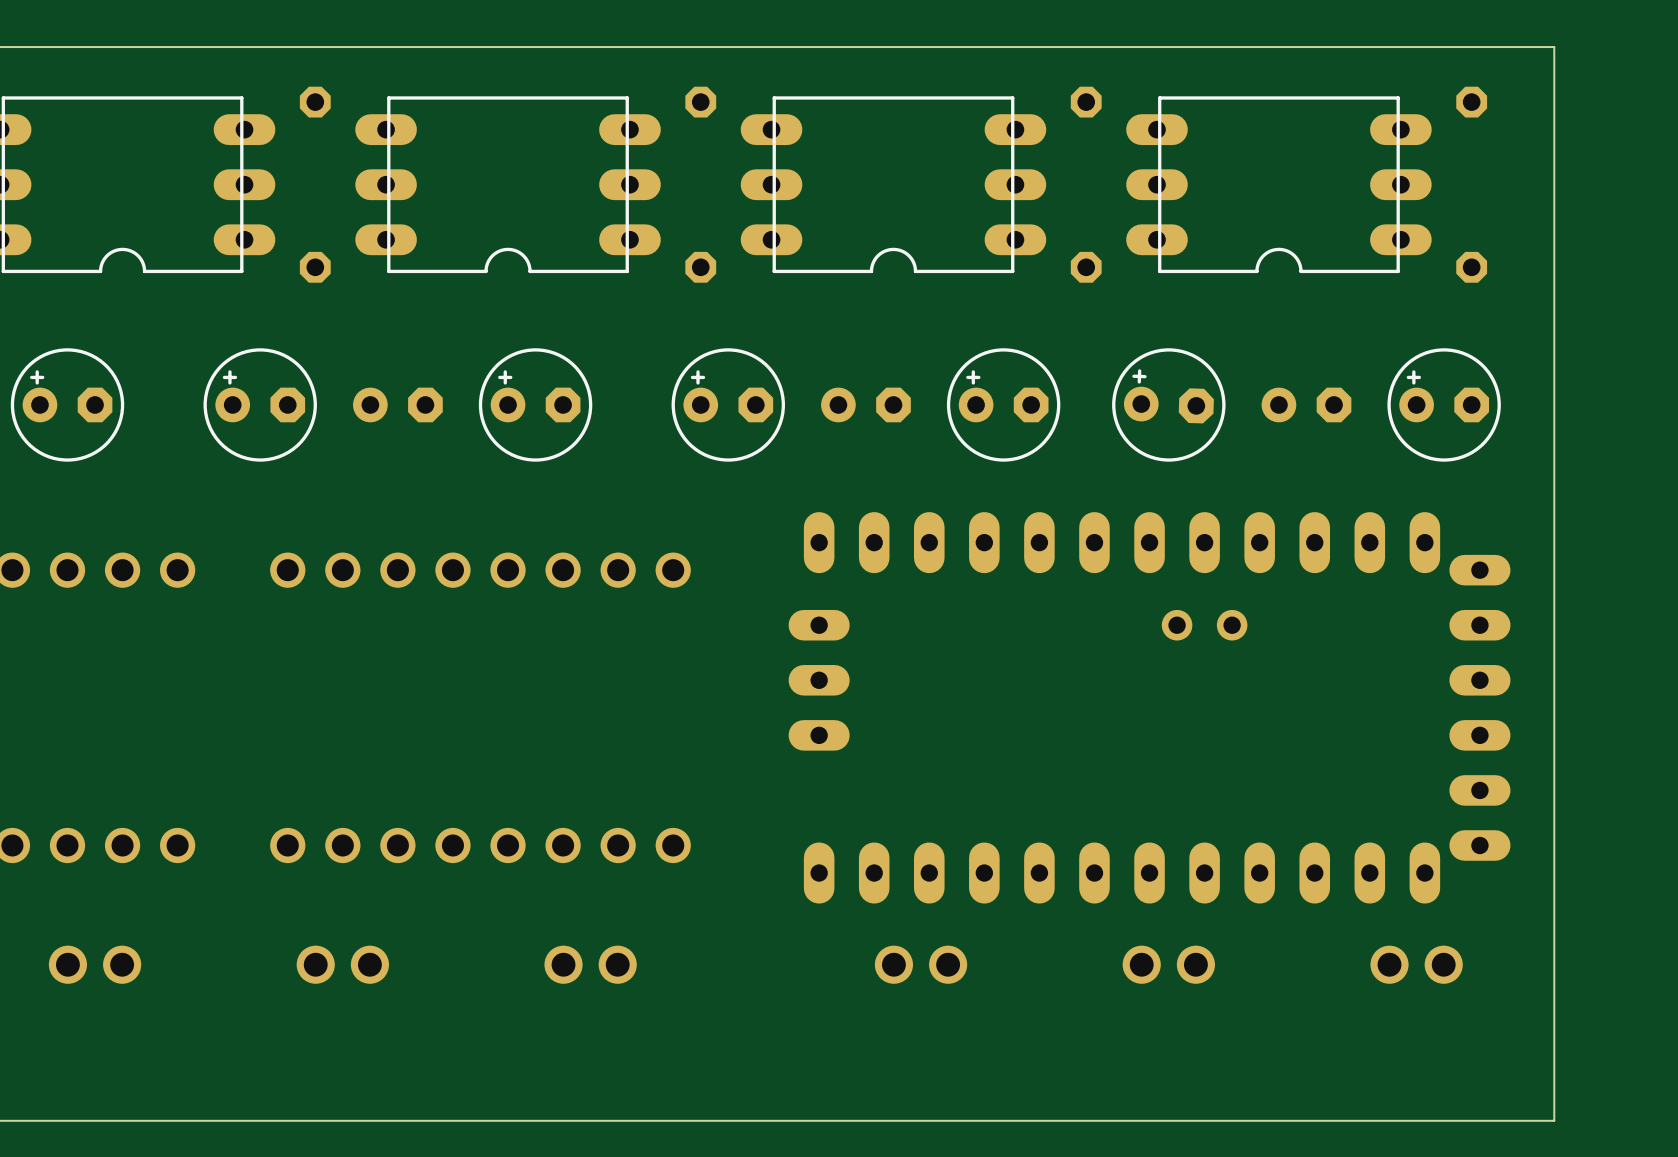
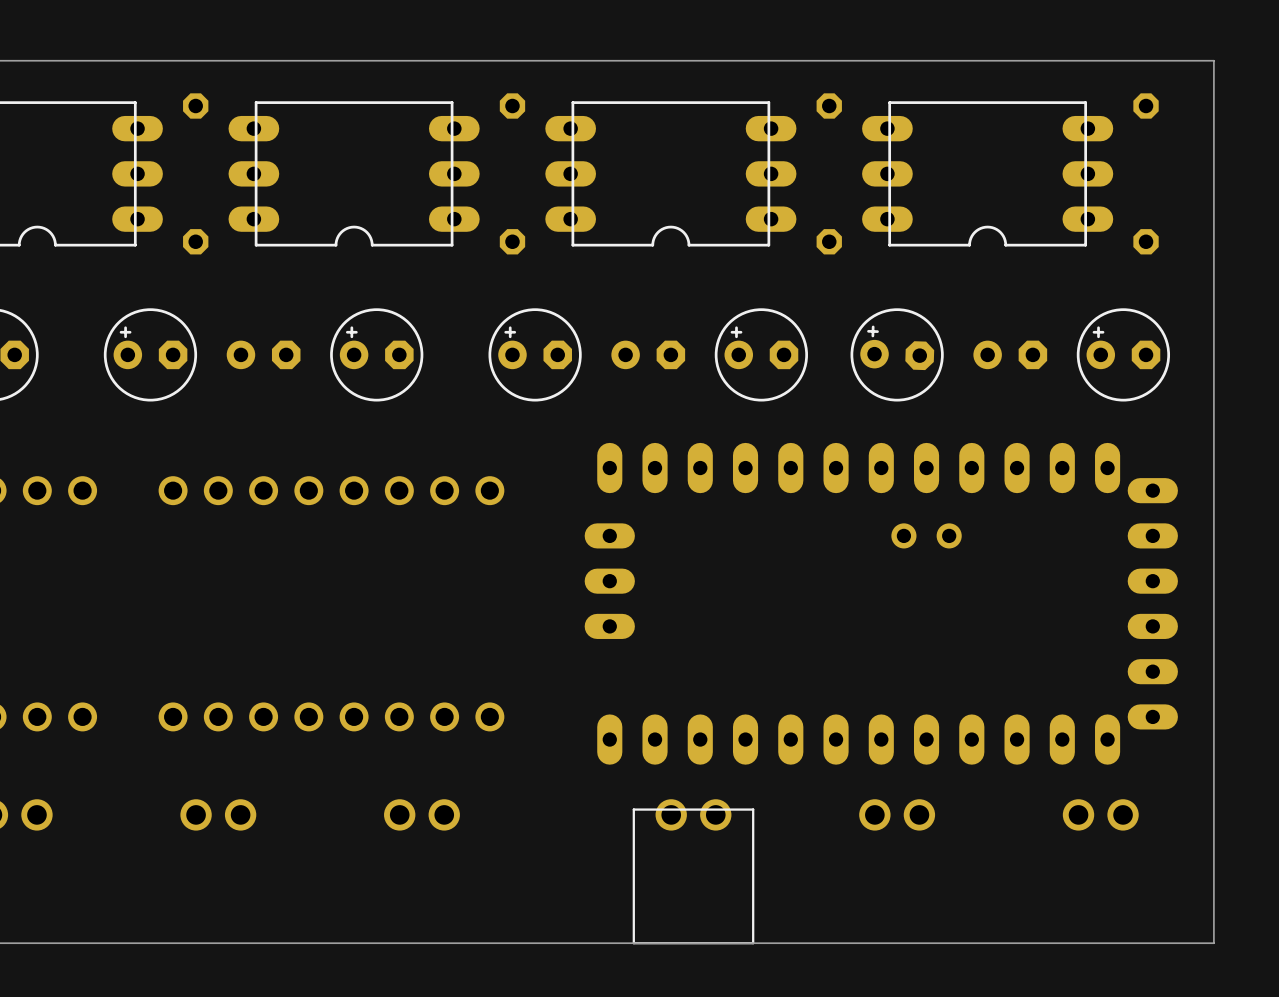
part side: top (921, 964) -> bottom (693, 871)

